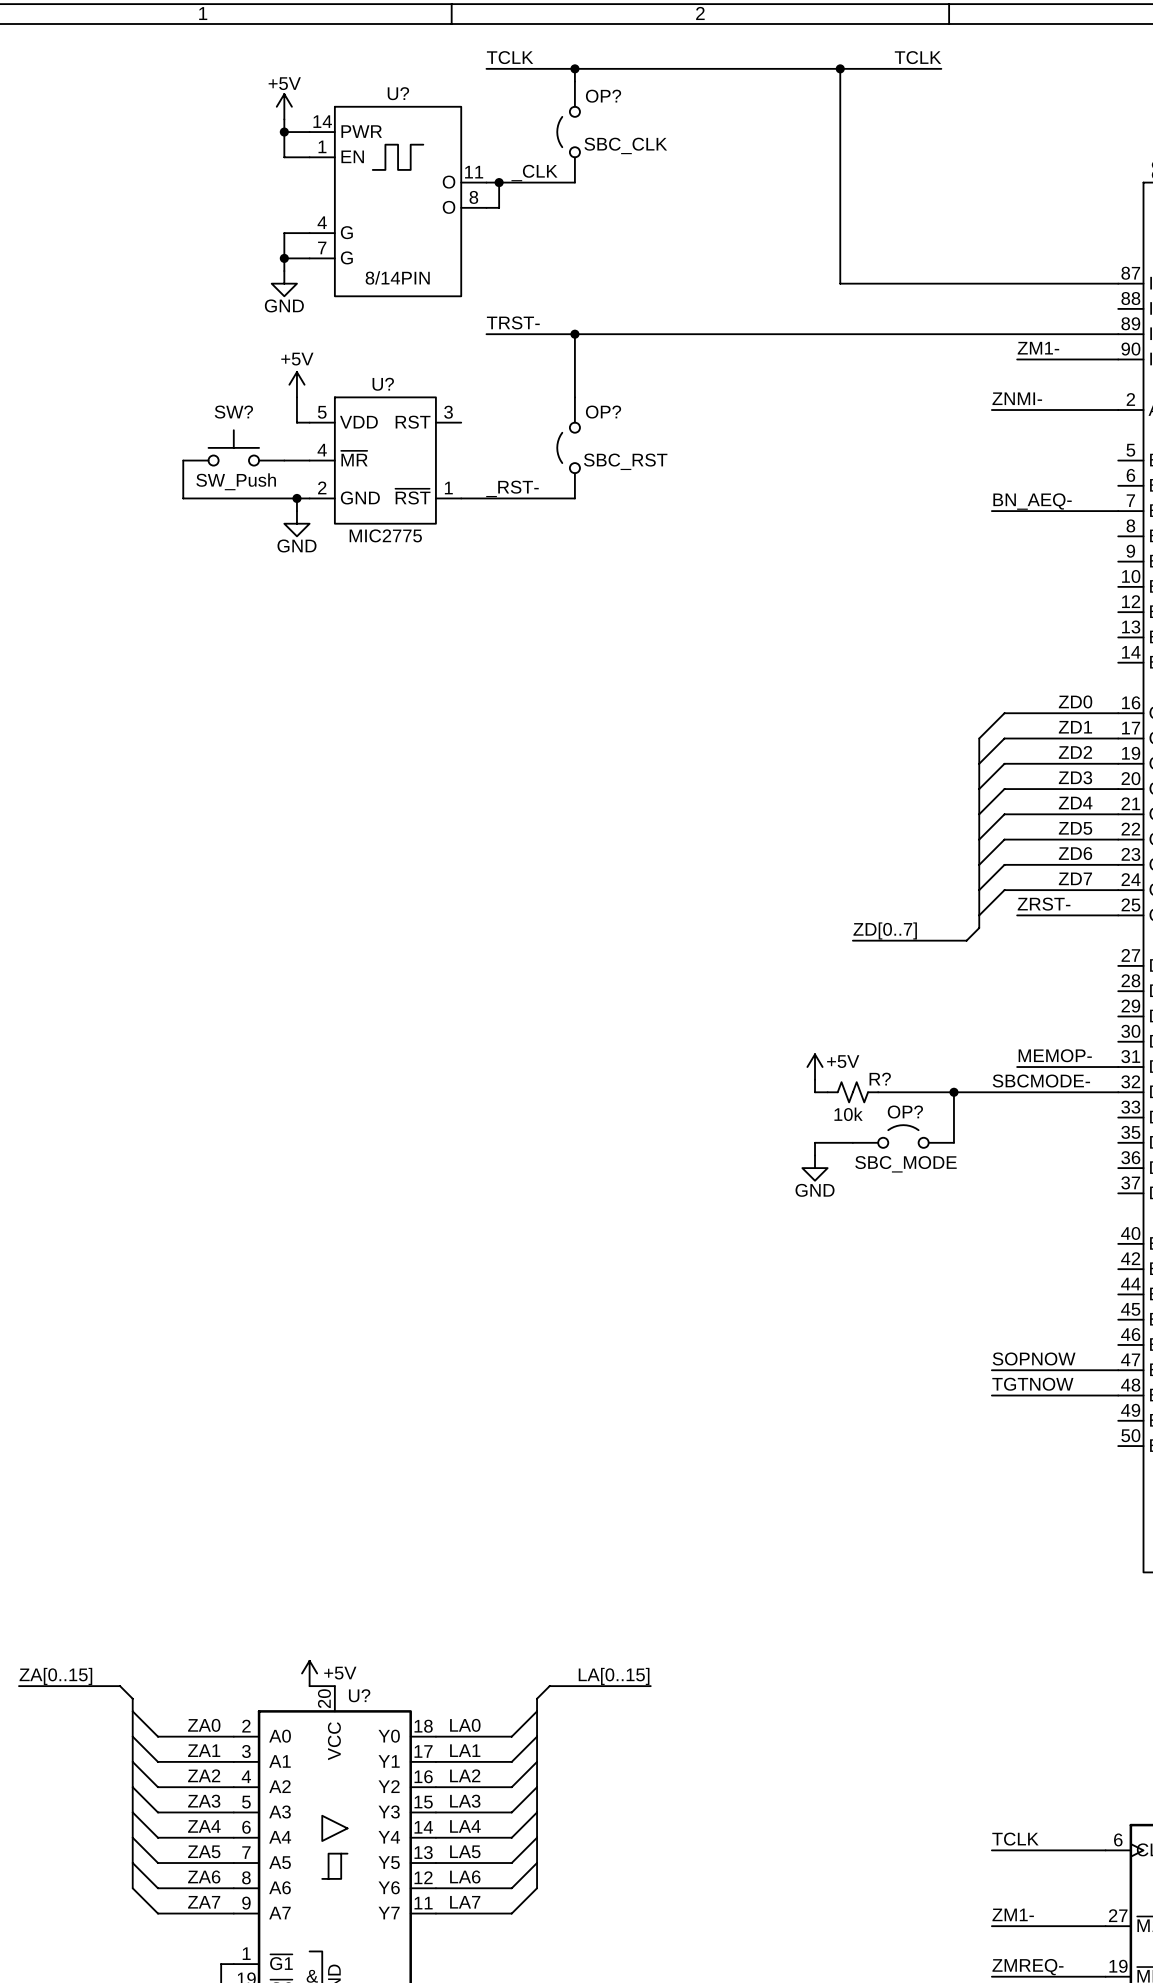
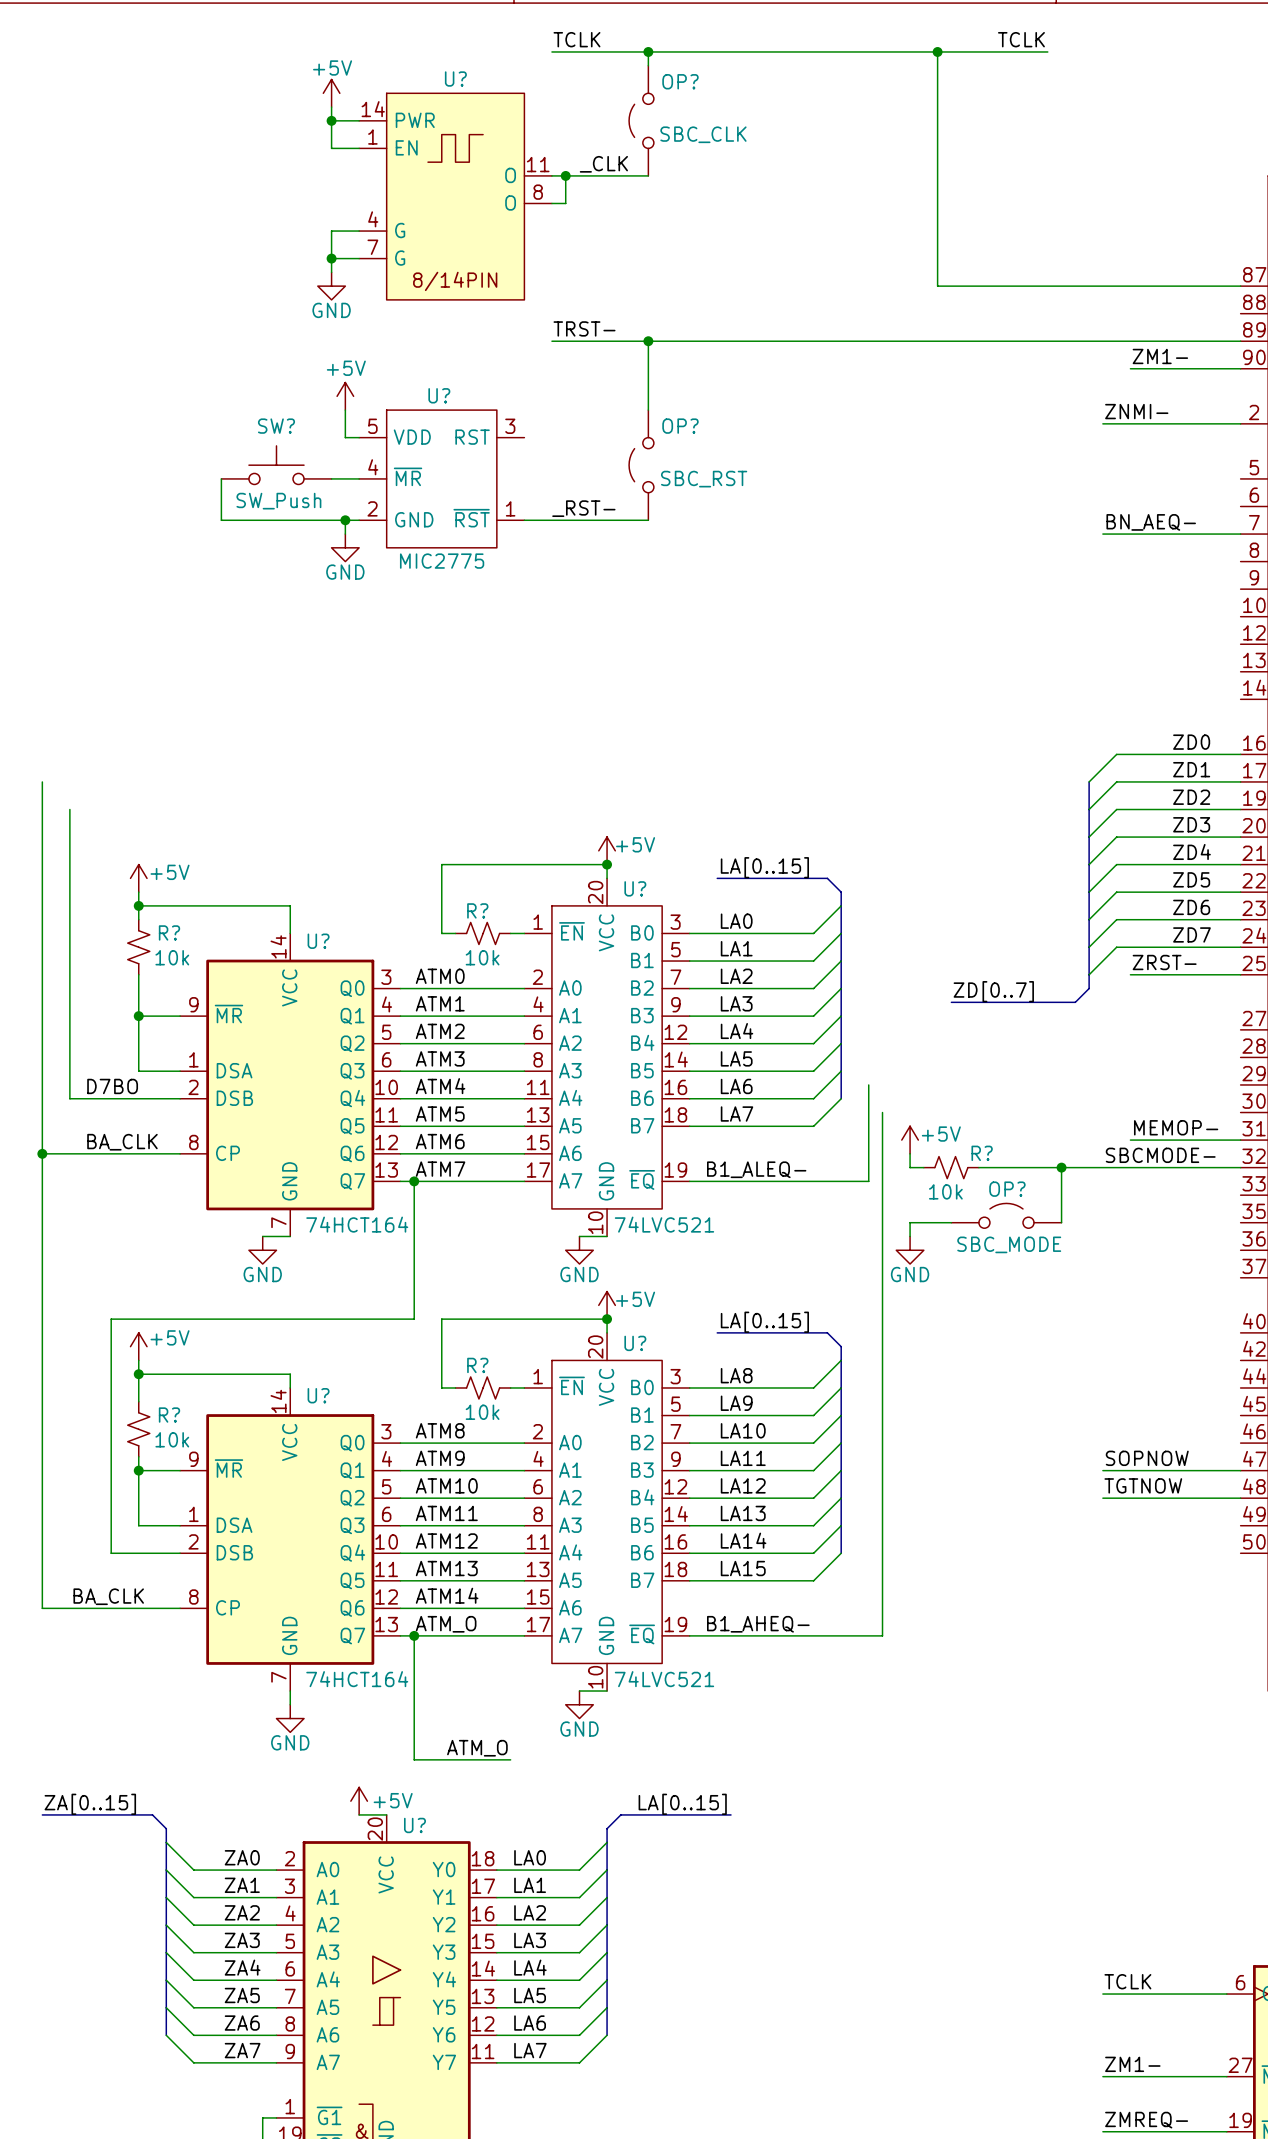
wire: none -> (42, 781) (42, 1608) (180, 1608)
wire: none -> (69, 809) (69, 1098) (180, 1098)
power symbol: none -> +5V (607, 850)
junction: none -> (607, 864)
label: none -> LA[0..15] (764, 867)
power symbol: none -> +5V (138, 878)
wire: none -> (607, 878) (607, 864) (441, 864) (441, 933) (455, 933)
bus: none -> (717, 878) (827, 878) (841, 892) (841, 1098)
wire: none -> (138, 892) (138, 919)
wire: none -> (138, 905) (290, 905) (290, 933)
junction: none -> (138, 905)
wire: none -> (841, 905) (813, 933) (689, 933)
label: none -> LA0 (736, 921)
R?: none -> 10k (483, 933)
wire: none -> (510, 933) (524, 933)
wire: none -> (841, 933) (813, 961) (689, 961)
R?: none -> 10k (138, 947)
label: none -> LA1 (736, 948)
wire: none -> (841, 961) (813, 988) (689, 988)
wire: none -> (138, 974) (138, 1071) (180, 1071)
label: none -> ATM0 (440, 976)
label: none -> LA2 (736, 976)
wire: none -> (400, 988) (524, 988)
wire: none -> (841, 988) (813, 1016) (689, 1016)
label: none -> ATM1 (440, 1003)
label: none -> LA3 (736, 1003)
wire: none -> (138, 1016) (180, 1016)
junction: none -> (138, 1016)
wire: none -> (400, 1016) (524, 1016)
wire: none -> (841, 1016) (813, 1043) (689, 1043)
label: none -> ATM2 (440, 1031)
label: none -> LA4 (737, 1031)
wire: none -> (400, 1043) (524, 1043)
wire: none -> (841, 1043) (813, 1071) (689, 1071)
U?: none -> 74LVC521 (607, 1057)
label: none -> ATM3 (440, 1058)
label: none -> LA5 (736, 1058)
wire: none -> (400, 1071) (524, 1071)
wire: none -> (841, 1071) (813, 1098) (689, 1098)
U?: none -> 74HCT164 (290, 1084)
wire: none -> (868, 1084) (868, 1181) (689, 1181)
label: none -> D7BO (112, 1086)
label: none -> ATM4 (440, 1086)
label: none -> LA6 (736, 1086)
wire: none -> (400, 1098) (524, 1098)
wire: none -> (841, 1098) (813, 1126) (689, 1126)
wire: none -> (882, 1112) (882, 1635) (689, 1635)
label: none -> ATM5 (440, 1114)
label: none -> LA7 (737, 1114)
wire: none -> (400, 1126) (524, 1126)
label: none -> ATM6 (440, 1141)
label: none -> BA_CLK (122, 1142)
wire: none -> (42, 1153) (180, 1153)
junction: none -> (42, 1153)
wire: none -> (400, 1153) (524, 1153)
label: none -> ATM7 (440, 1169)
label: none -> B1_ALEQ- (756, 1169)
wire: none -> (400, 1181) (524, 1181)
wire: none -> (414, 1181) (414, 1319) (111, 1319) (111, 1553) (180, 1553)
junction: none -> (414, 1181)
wire: none -> (262, 1236) (290, 1236)
wire: none -> (579, 1236) (607, 1236)
power symbol: none -> GND (262, 1250)
power symbol: none -> GND (579, 1250)
power symbol: none -> +5V (607, 1305)
junction: none -> (607, 1319)
label: none -> LA[0..15] (764, 1322)
wire: none -> (607, 1332) (607, 1319) (441, 1319) (441, 1387) (455, 1387)
bus: none -> (717, 1332) (827, 1332) (841, 1346) (841, 1553)
power symbol: none -> +5V (138, 1346)
wire: none -> (138, 1360) (138, 1401)
wire: none -> (841, 1360) (813, 1387) (689, 1387)
wire: none -> (138, 1374) (290, 1374) (290, 1387)
junction: none -> (138, 1374)
label: none -> LA8 (736, 1375)
R?: none -> 10k (483, 1387)
wire: none -> (510, 1387) (524, 1387)
wire: none -> (841, 1387) (813, 1415) (689, 1415)
label: none -> LA9 (736, 1403)
wire: none -> (841, 1415) (813, 1443) (689, 1443)
R?: none -> 10k (138, 1429)
label: none -> ATM8 (440, 1430)
label: none -> LA10 (743, 1430)
wire: none -> (400, 1443) (524, 1443)
wire: none -> (841, 1443) (813, 1470) (689, 1470)
wire: none -> (138, 1456) (138, 1525) (180, 1525)
label: none -> ATM9 (440, 1458)
label: none -> LA11 (743, 1458)
wire: none -> (138, 1470) (180, 1470)
junction: none -> (138, 1470)
wire: none -> (400, 1470) (524, 1470)
wire: none -> (841, 1470) (813, 1498) (689, 1498)
label: none -> ATM10 (446, 1485)
label: none -> LA12 (743, 1485)
wire: none -> (400, 1498) (524, 1498)
wire: none -> (841, 1498) (813, 1525) (689, 1525)
U?: none -> 74LVC521 (607, 1511)
label: none -> ATM11 (446, 1513)
label: none -> LA13 (743, 1513)
wire: none -> (400, 1525) (524, 1525)
wire: none -> (841, 1525) (813, 1553) (689, 1553)
U?: none -> 74HCT164 (290, 1539)
label: none -> ATM12 (446, 1540)
label: none -> LA14 (743, 1540)
wire: none -> (400, 1553) (524, 1553)
wire: none -> (841, 1553) (813, 1580) (689, 1580)
label: none -> ATM13 (446, 1568)
label: none -> LA15 (743, 1568)
wire: none -> (400, 1580) (524, 1580)
label: none -> ATM14 (447, 1595)
label: none -> BA_CLK (108, 1596)
wire: none -> (400, 1608) (524, 1608)
label: none -> ATM_O (446, 1624)
label: none -> B1_AHEQ- (758, 1624)
wire: none -> (400, 1635) (524, 1635)
wire: none -> (414, 1635) (414, 1759) (510, 1759)
junction: none -> (414, 1635)
wire: none -> (290, 1691) (290, 1704)
wire: none -> (579, 1691) (607, 1691)
power symbol: none -> GND (579, 1704)
power symbol: none -> GND (290, 1718)
label: none -> ATM_O (477, 1748)

